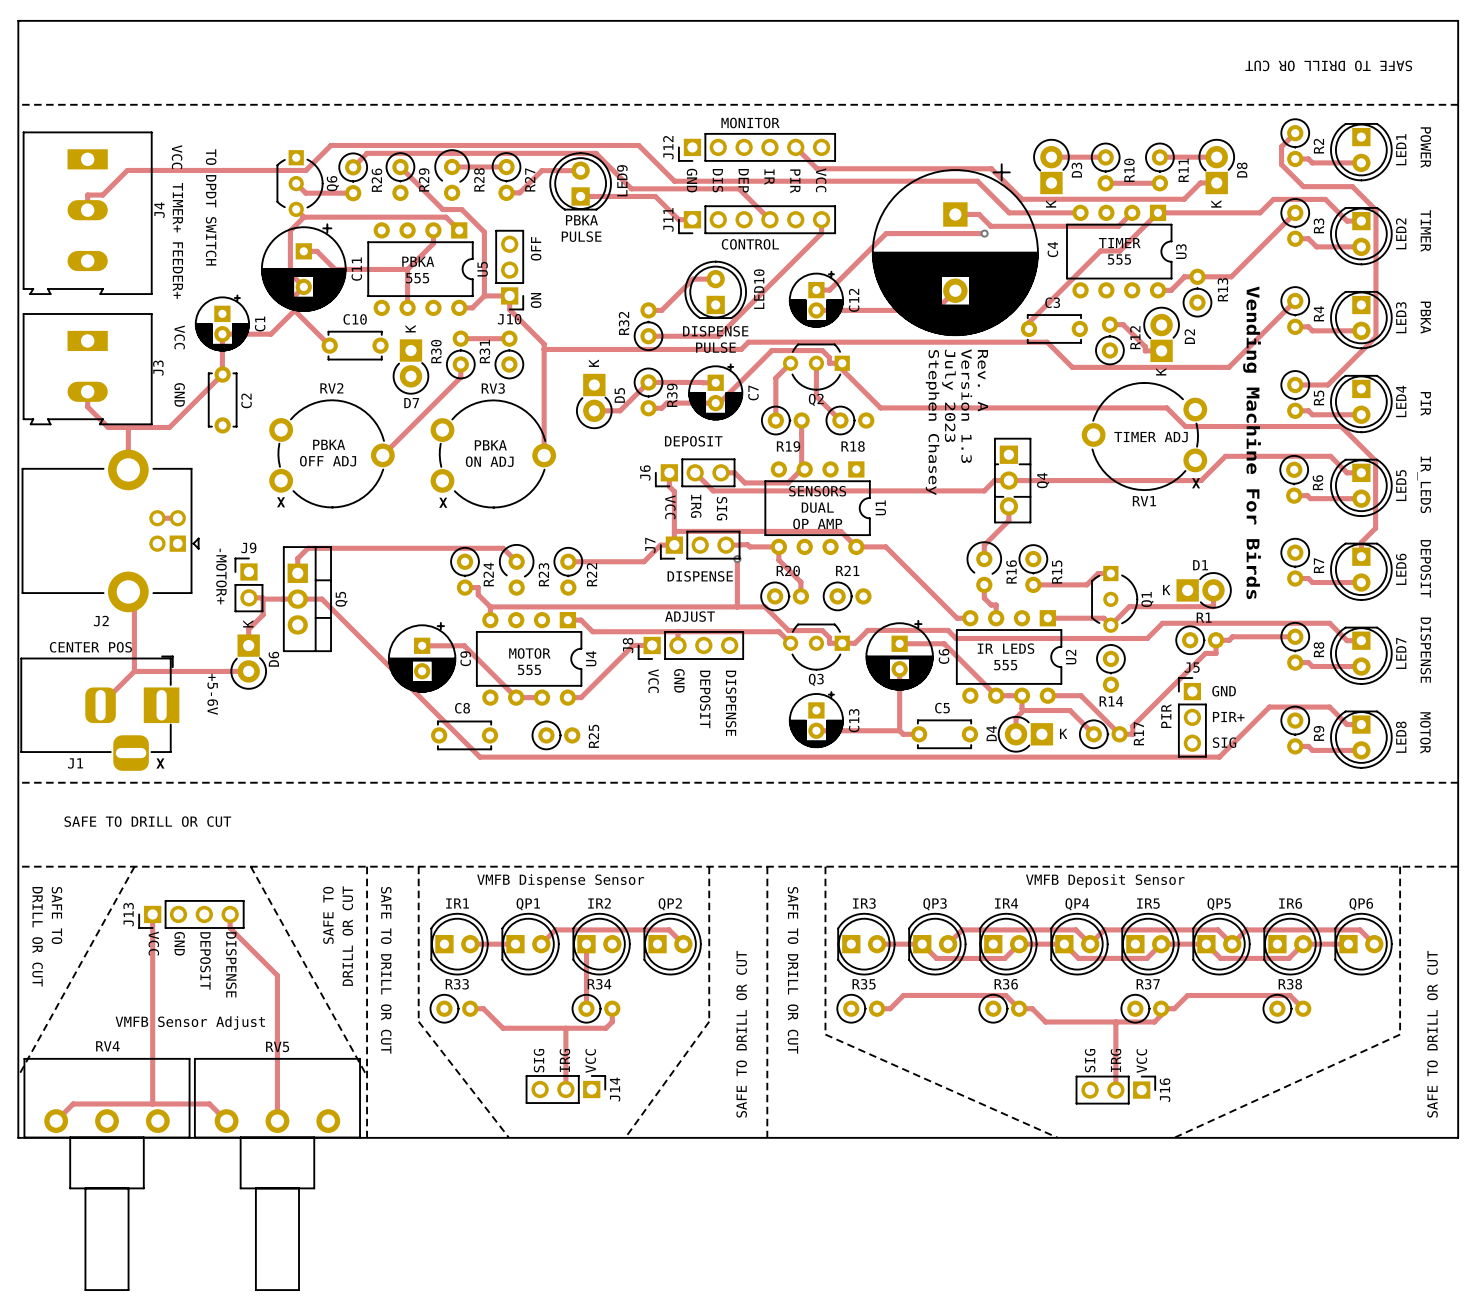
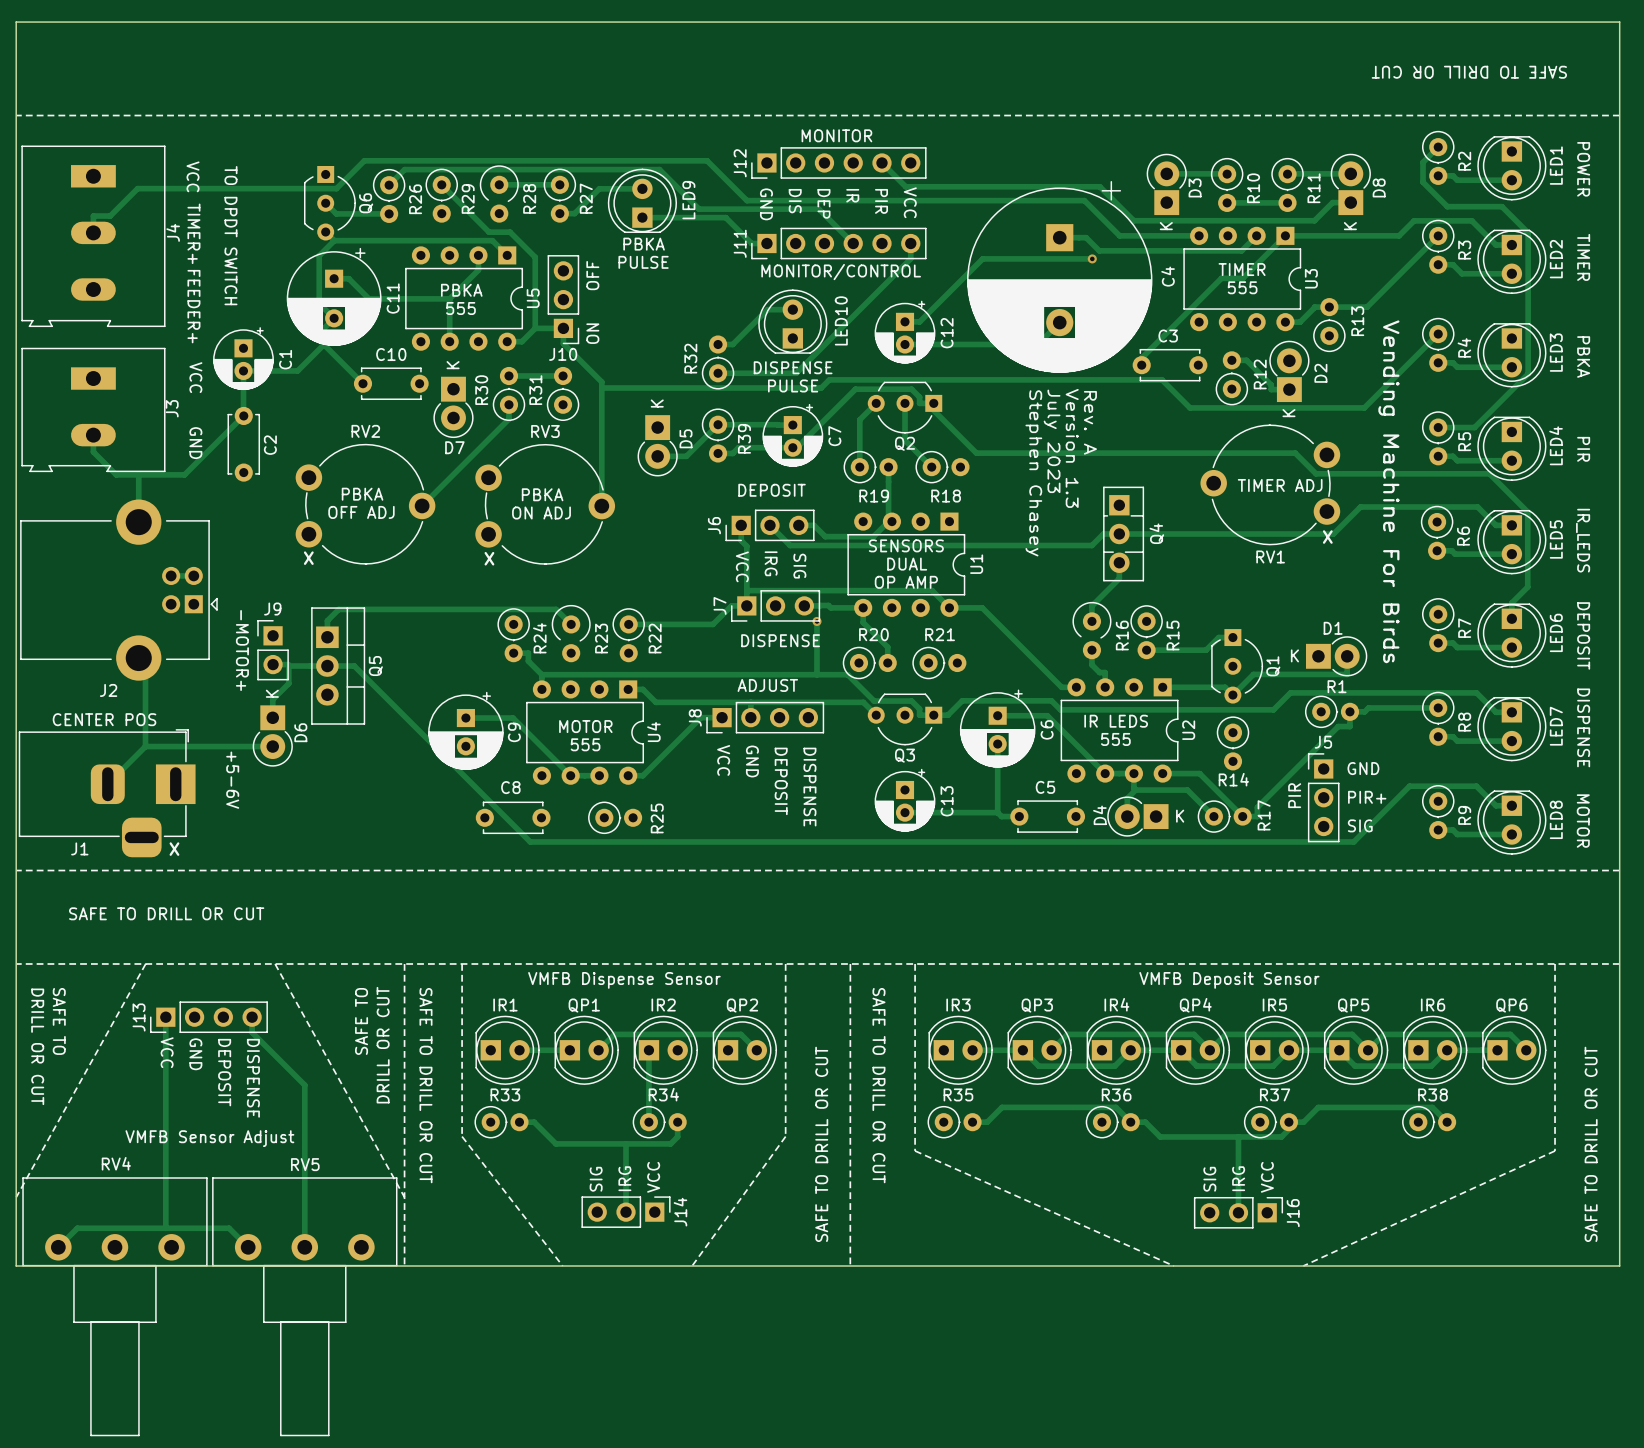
text: CONTROL (750, 244) -> MONITOR/CONTROL (841, 272)

